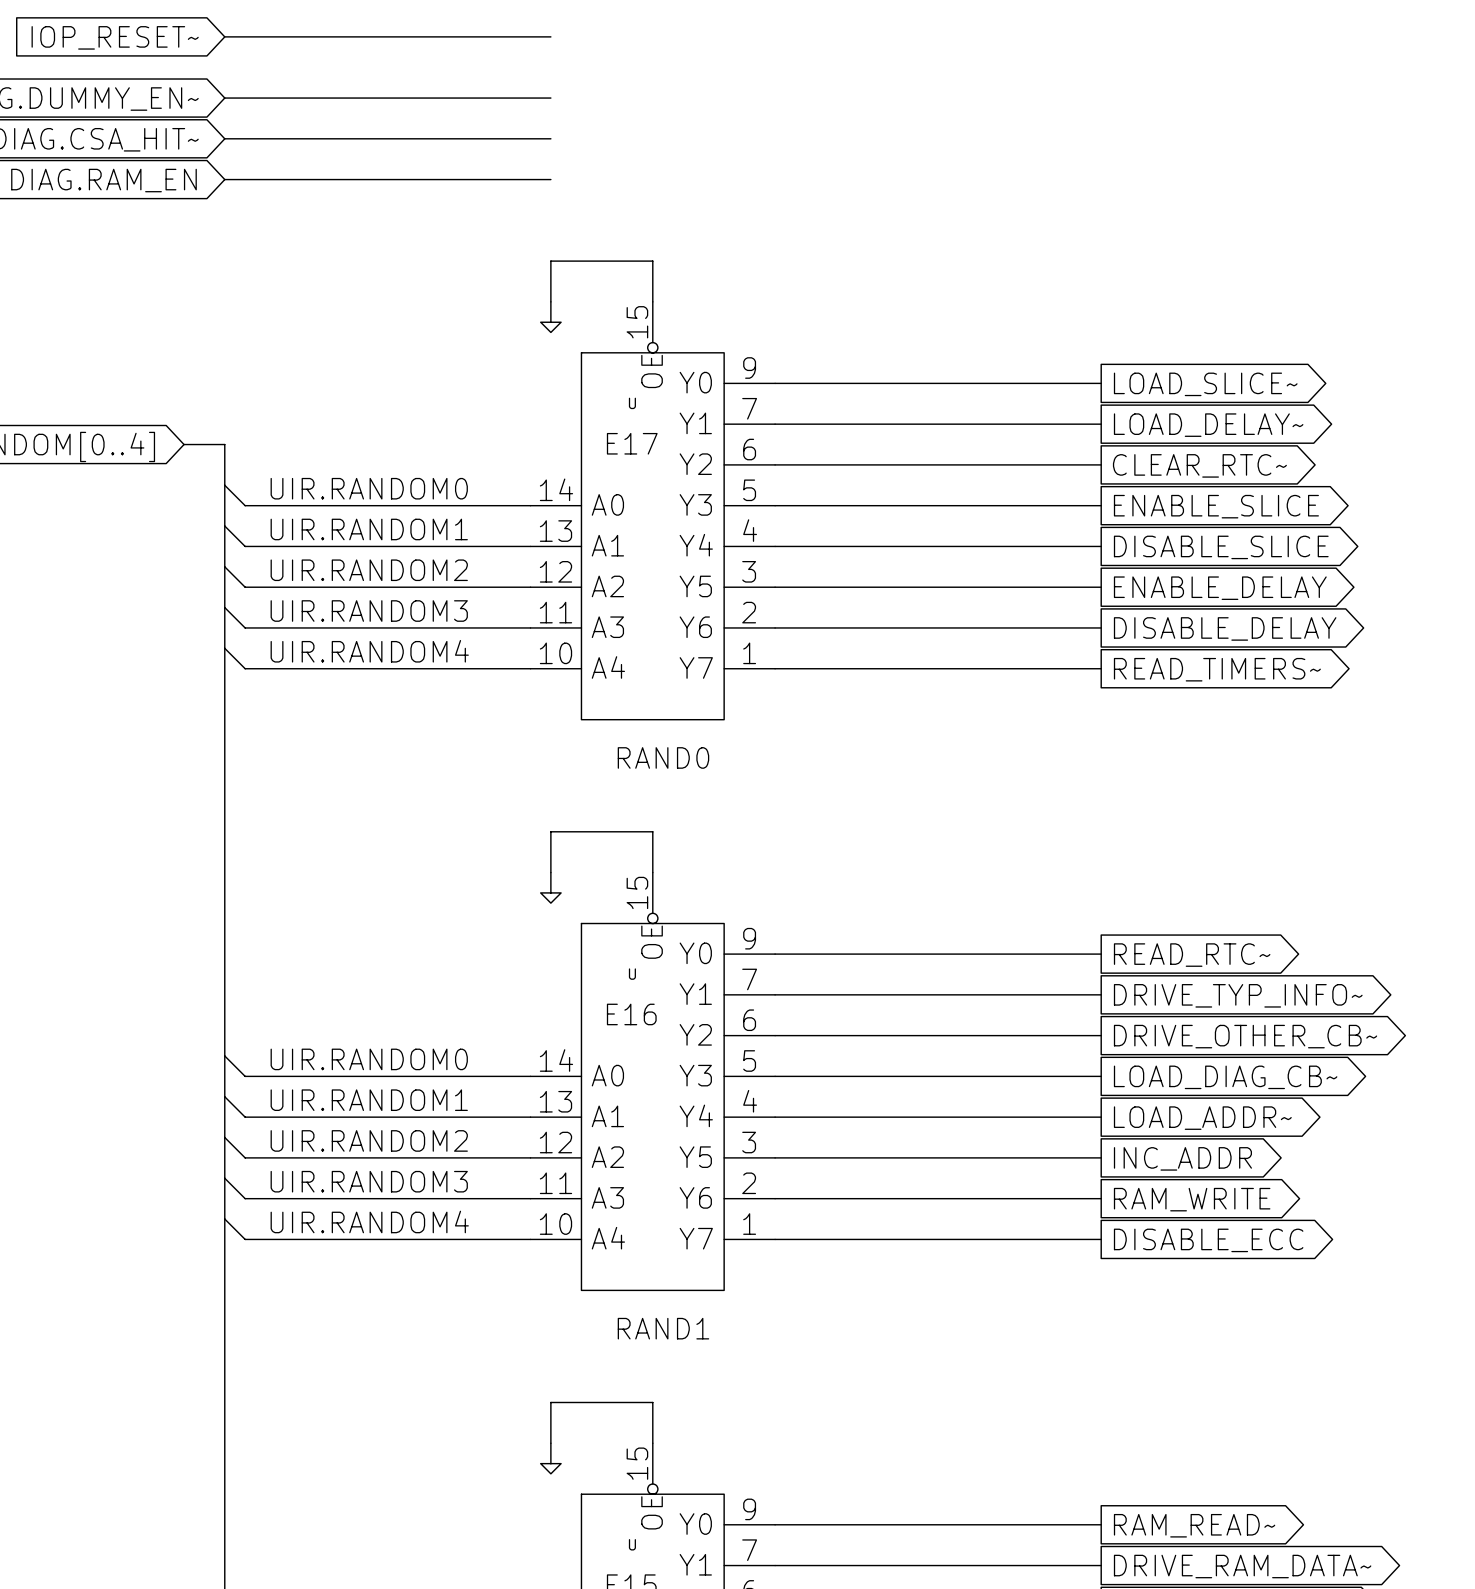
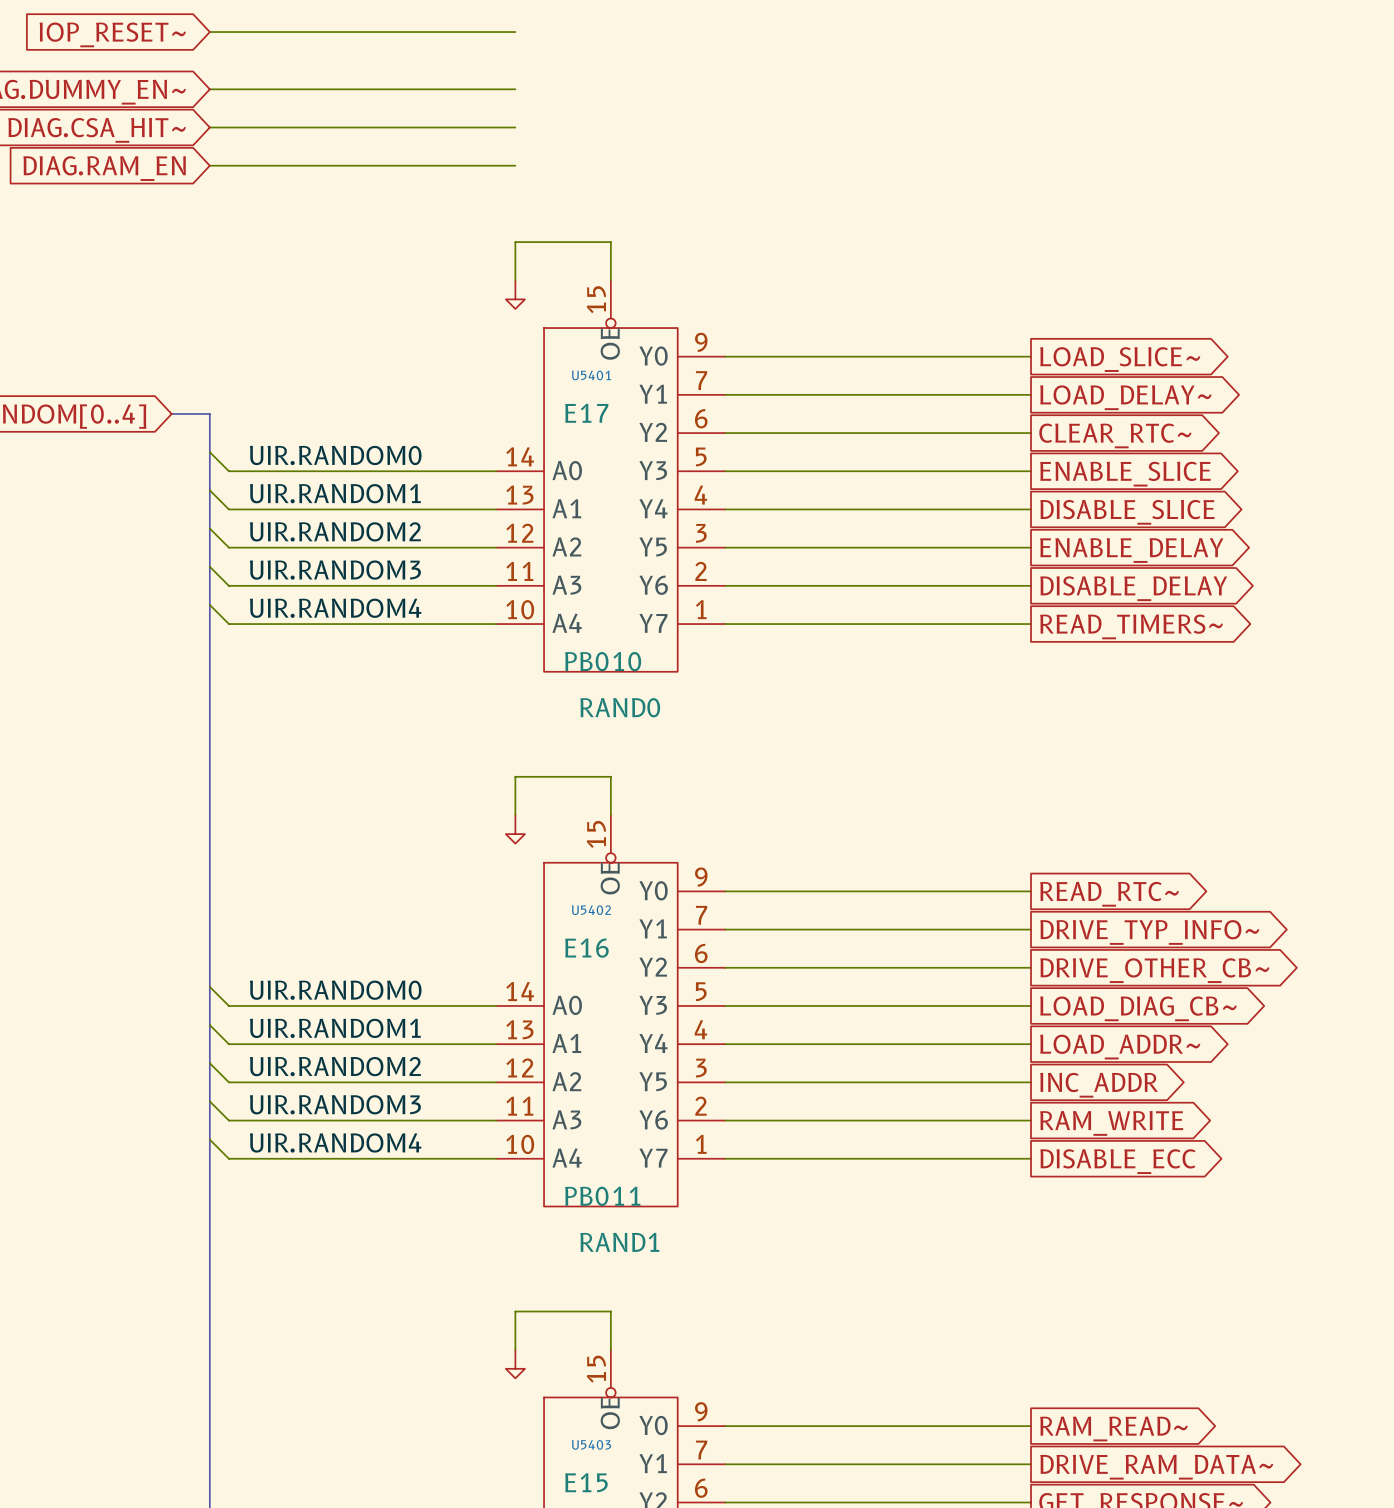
U name: U (632, 403) -> U5401 (591, 375)
U value: none -> PB010 (603, 661)
U name: U (632, 974) -> U5402 (591, 910)
U value: none -> PB011 (602, 1196)
U name: U (632, 1544) -> U5403 (591, 1444)

